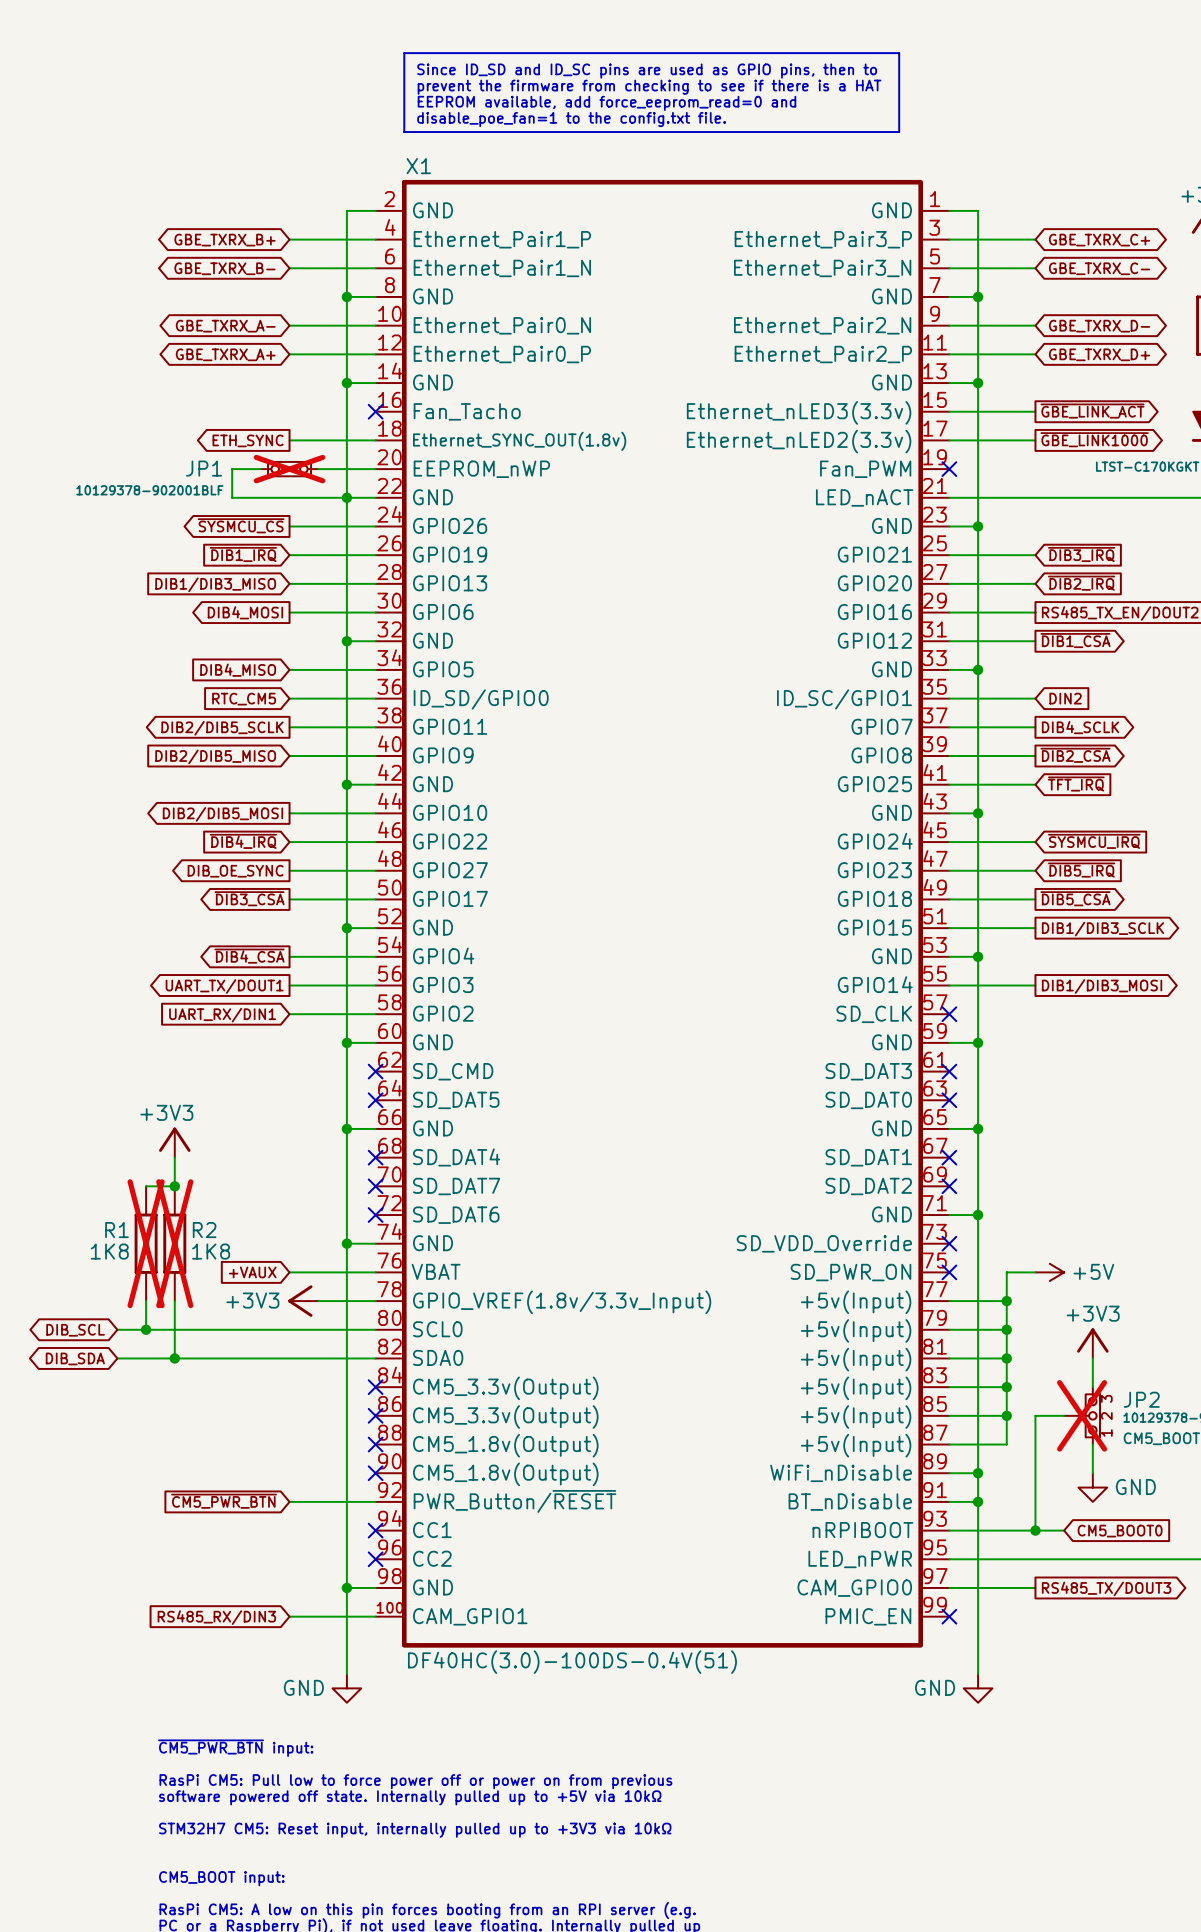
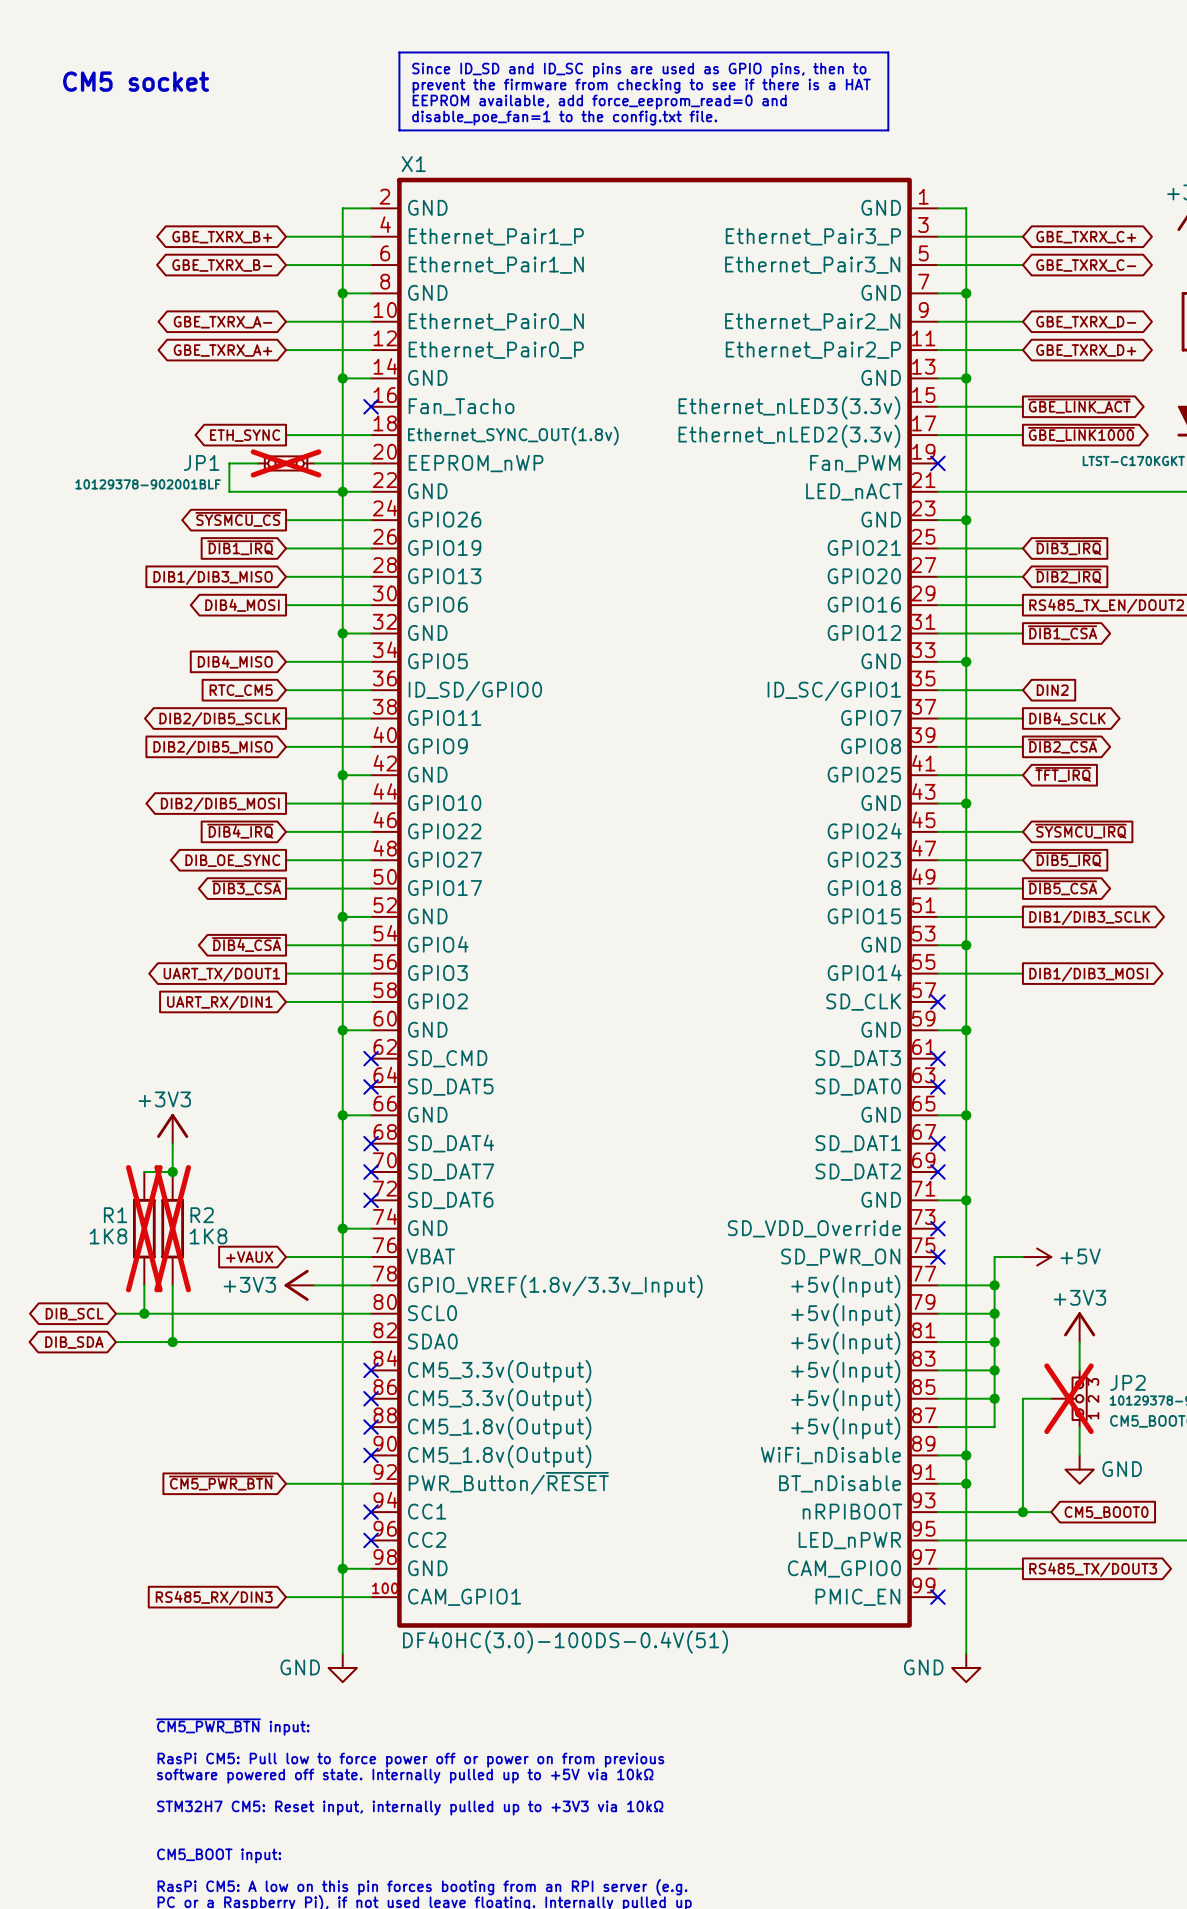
text: none -> CM5 socket (136, 81)

